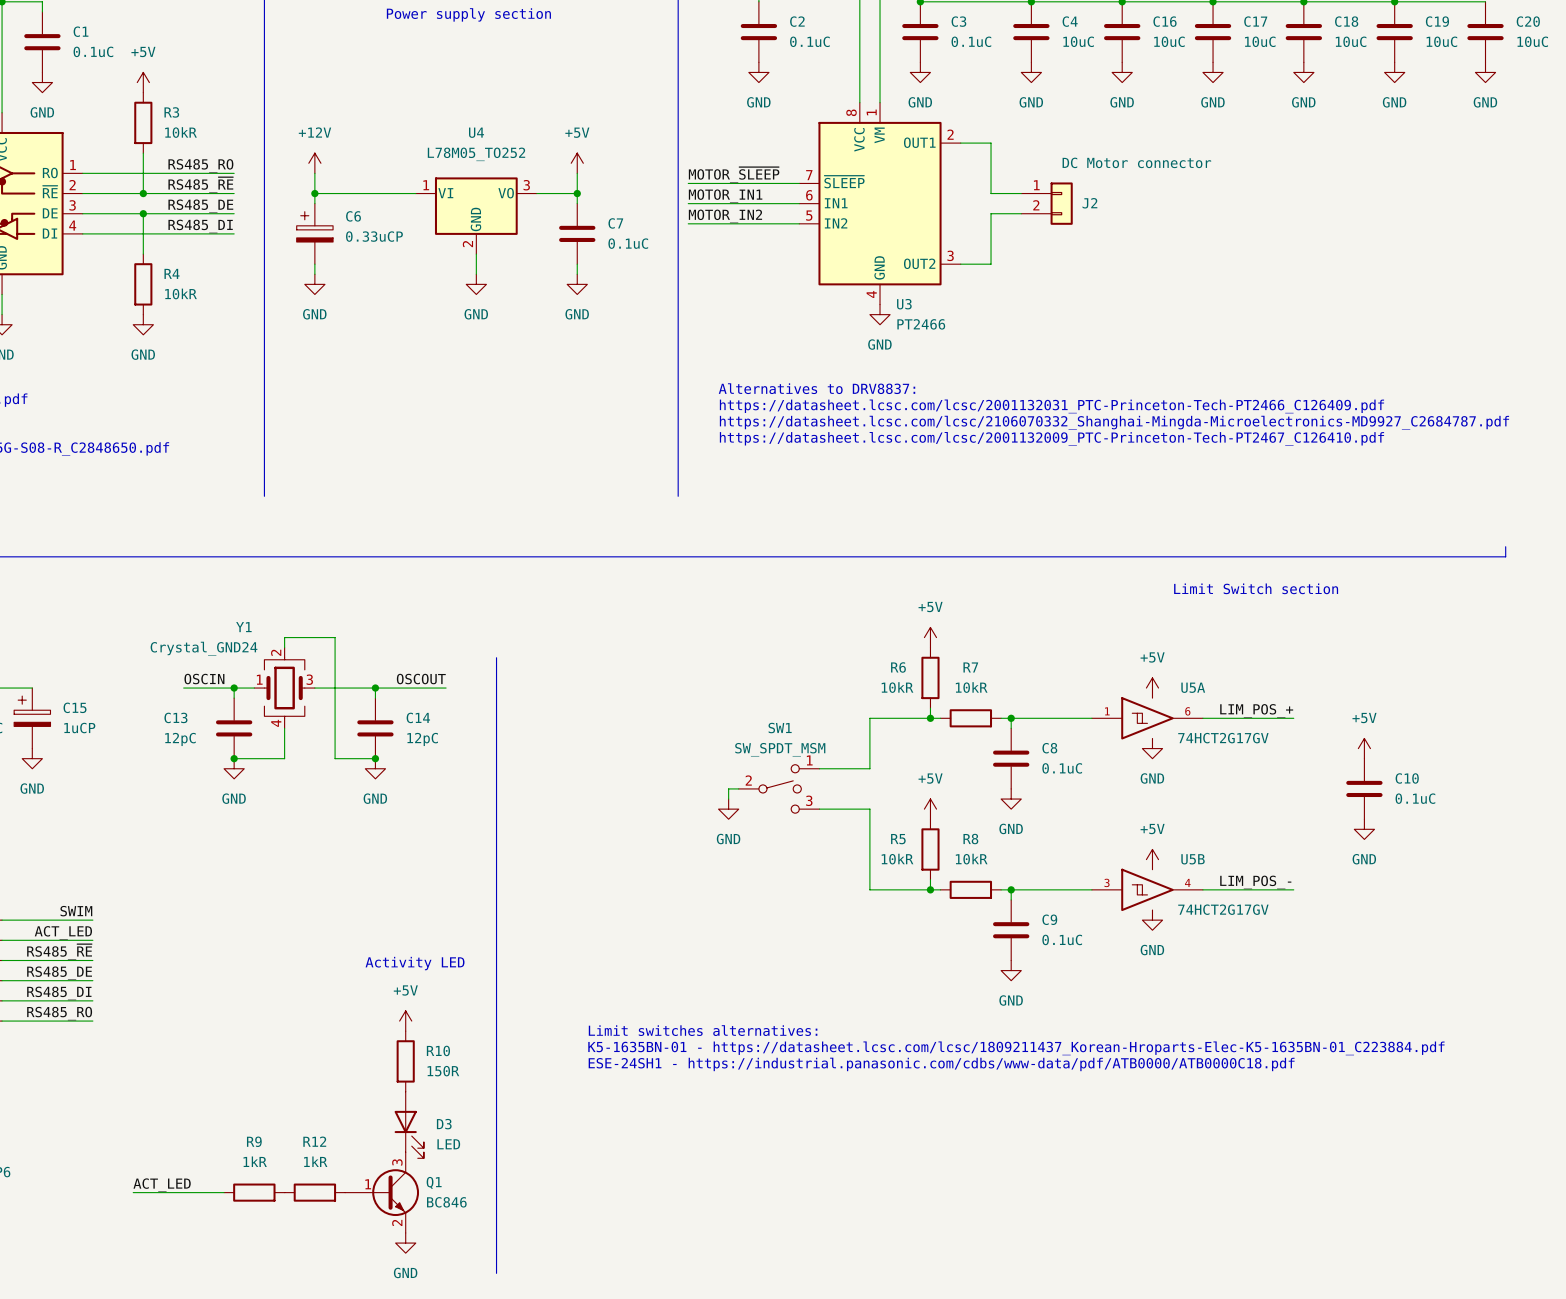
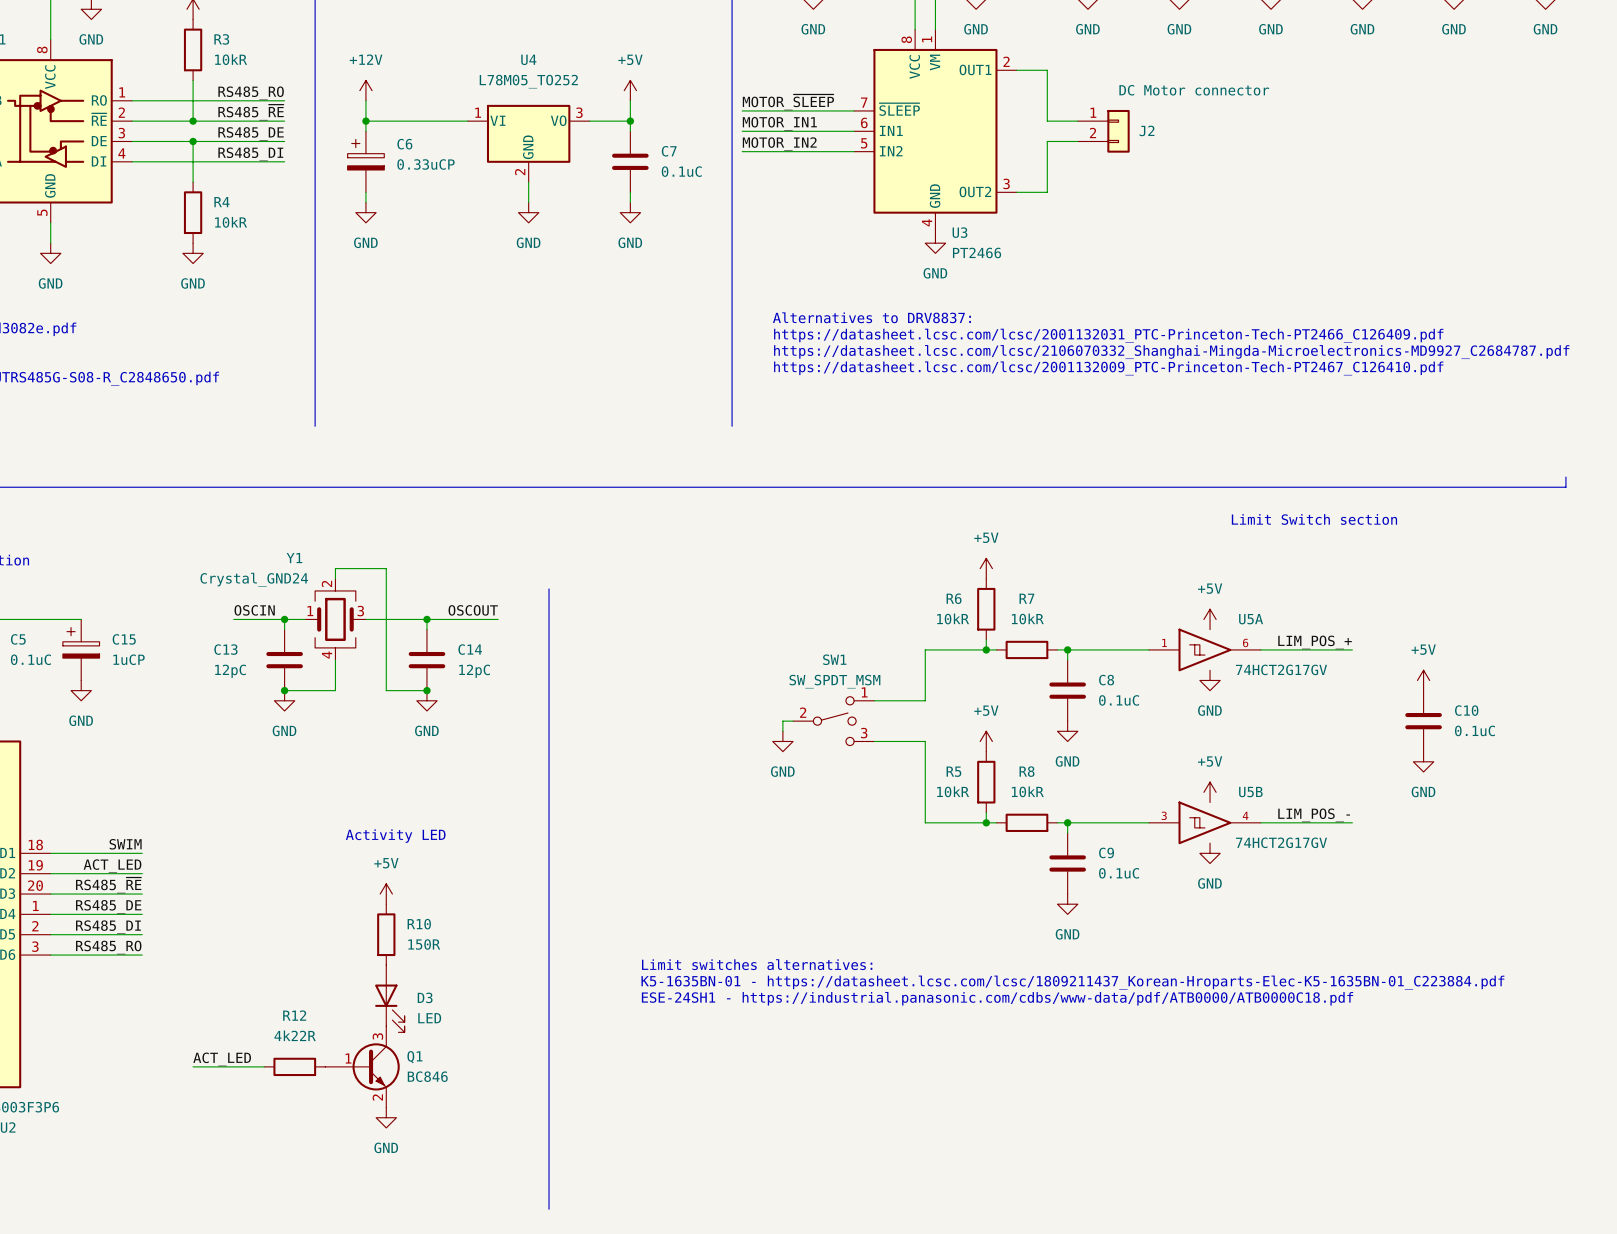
text position: Activity LED (415, 963) -> Activity LED (395, 836)
power symbol position: +5V (405, 1021) -> +5V (386, 894)
R10 position: (405, 1061) -> (386, 934)
D3 position: (409, 1124) -> (389, 998)
wire: none -> (193, 1066) (264, 1066)
R12 value: 1kR (315, 1161) -> 4k22R (295, 1035)
label position: ACT_LED (162, 1185) -> ACT_LED (222, 1059)
wire: (133, 1192) (224, 1192) -> none
R9: 1kR (254, 1192) -> none
R12 position: (314, 1192) -> (294, 1066)
Q1 position: (382, 1192) -> (362, 1066)
power symbol position: GND (405, 1243) -> GND (386, 1117)

